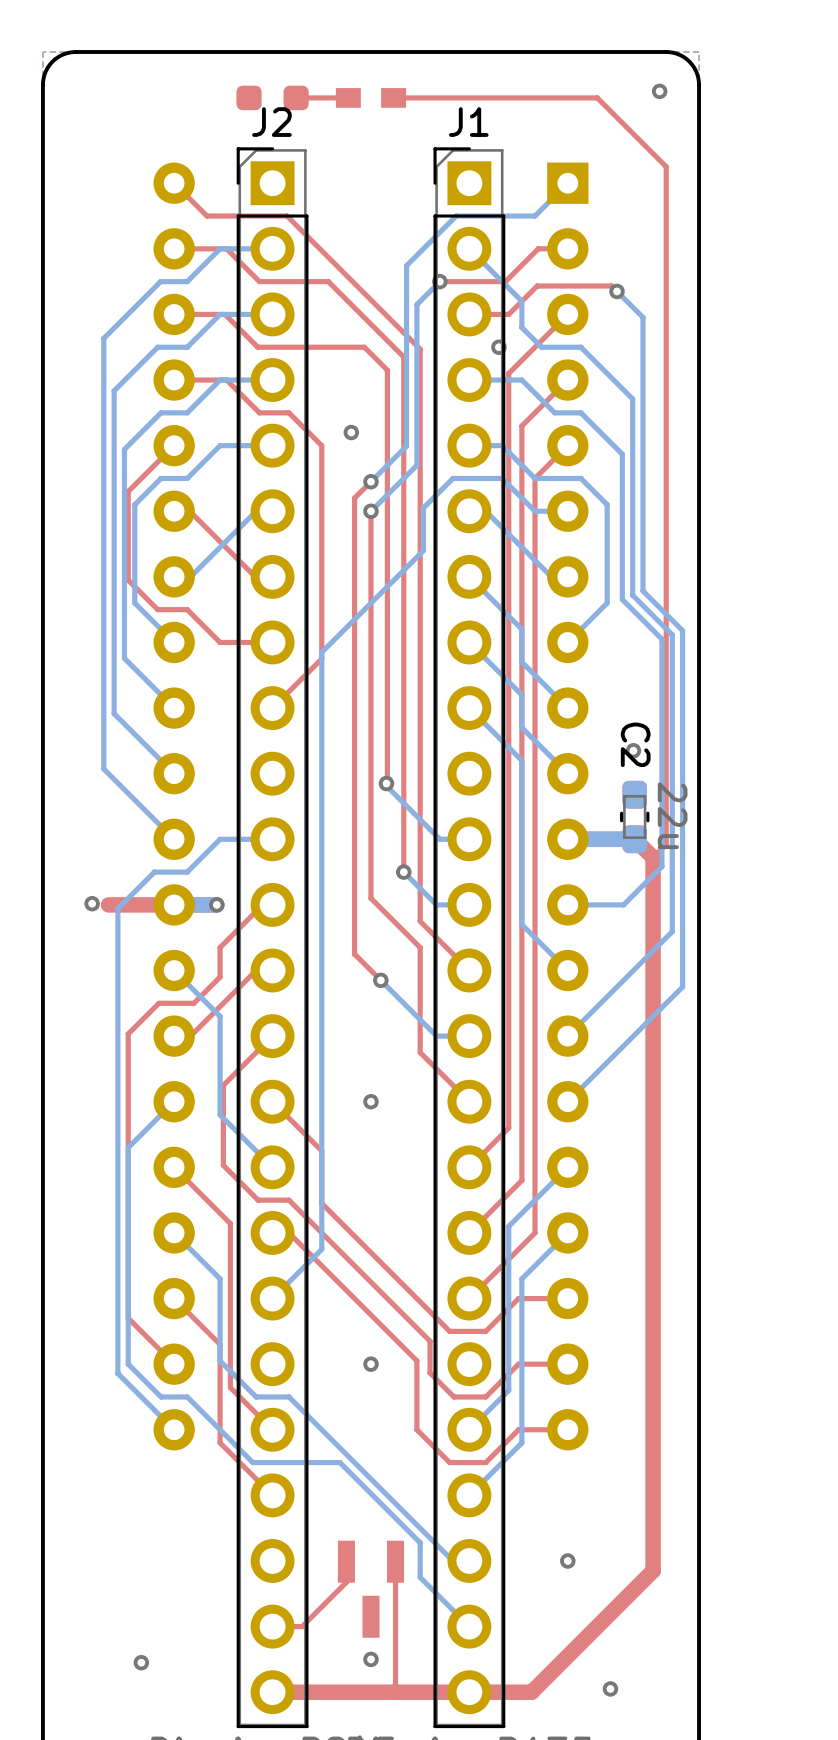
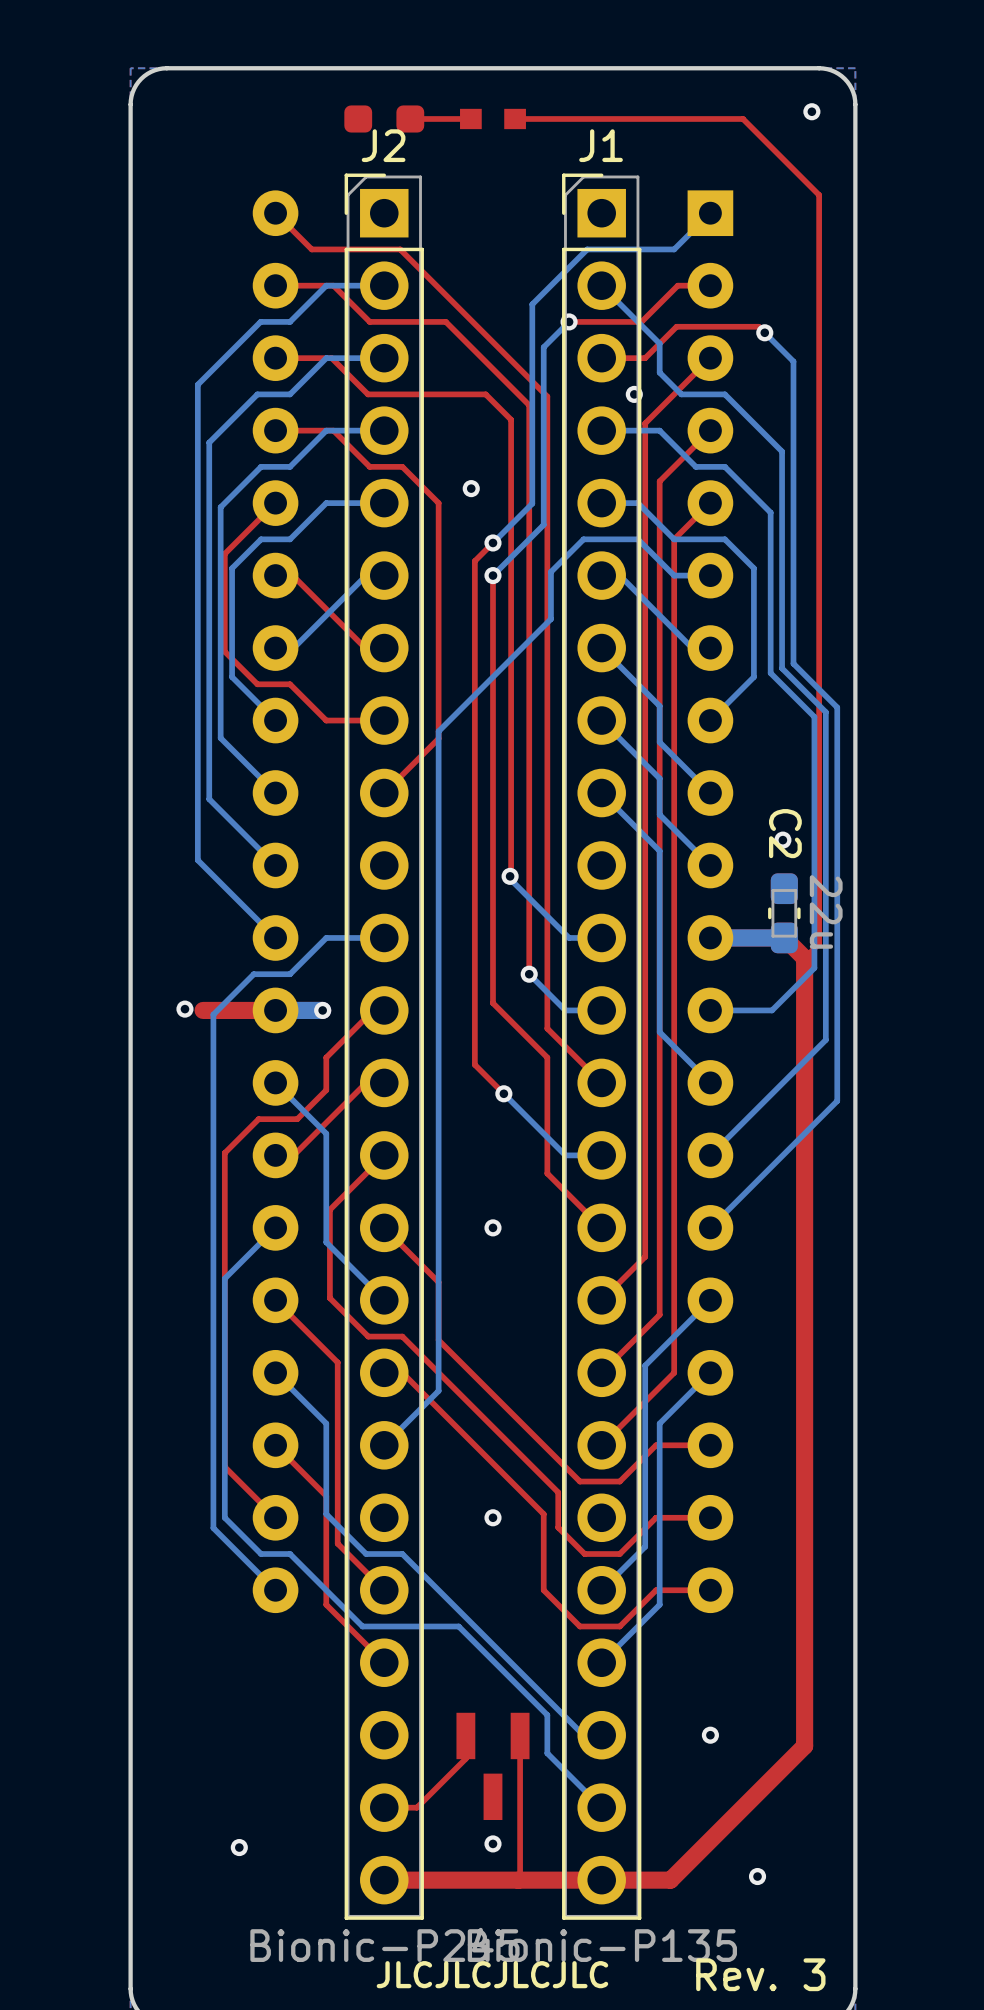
part footprint: [335, 88, 407, 108] -> [460, 108, 526, 130]

